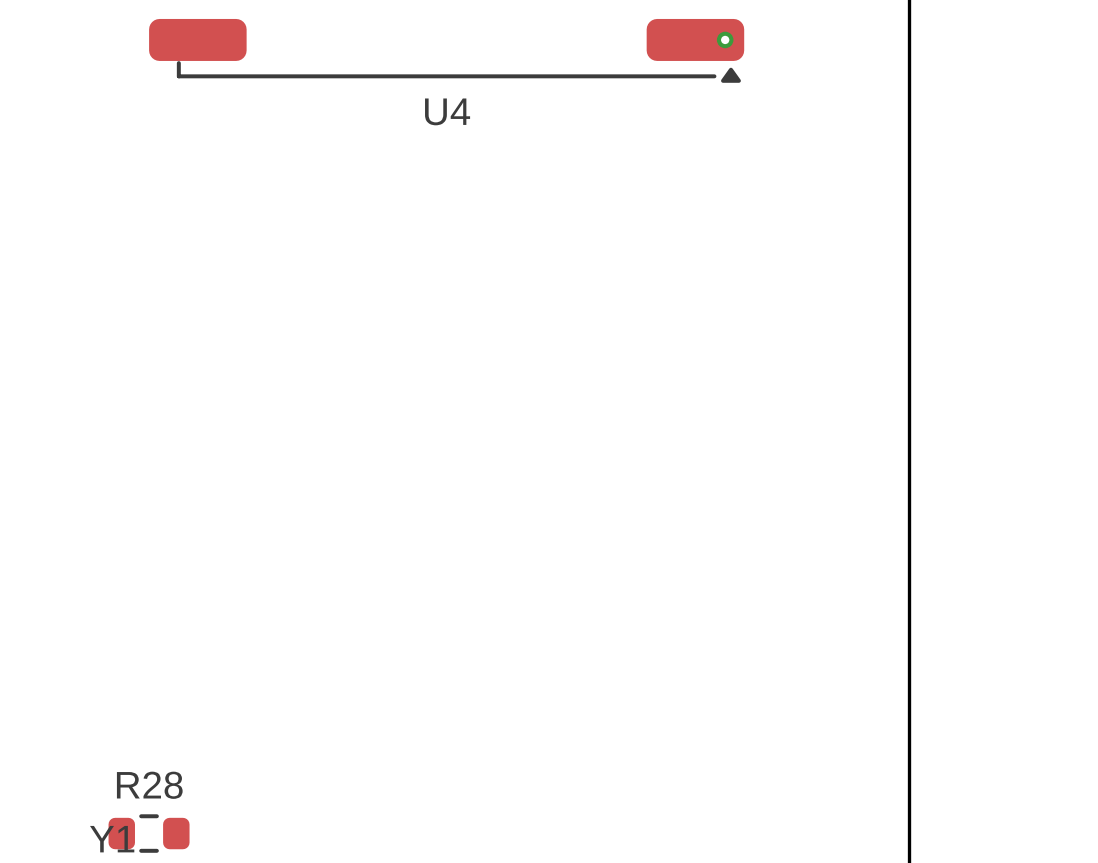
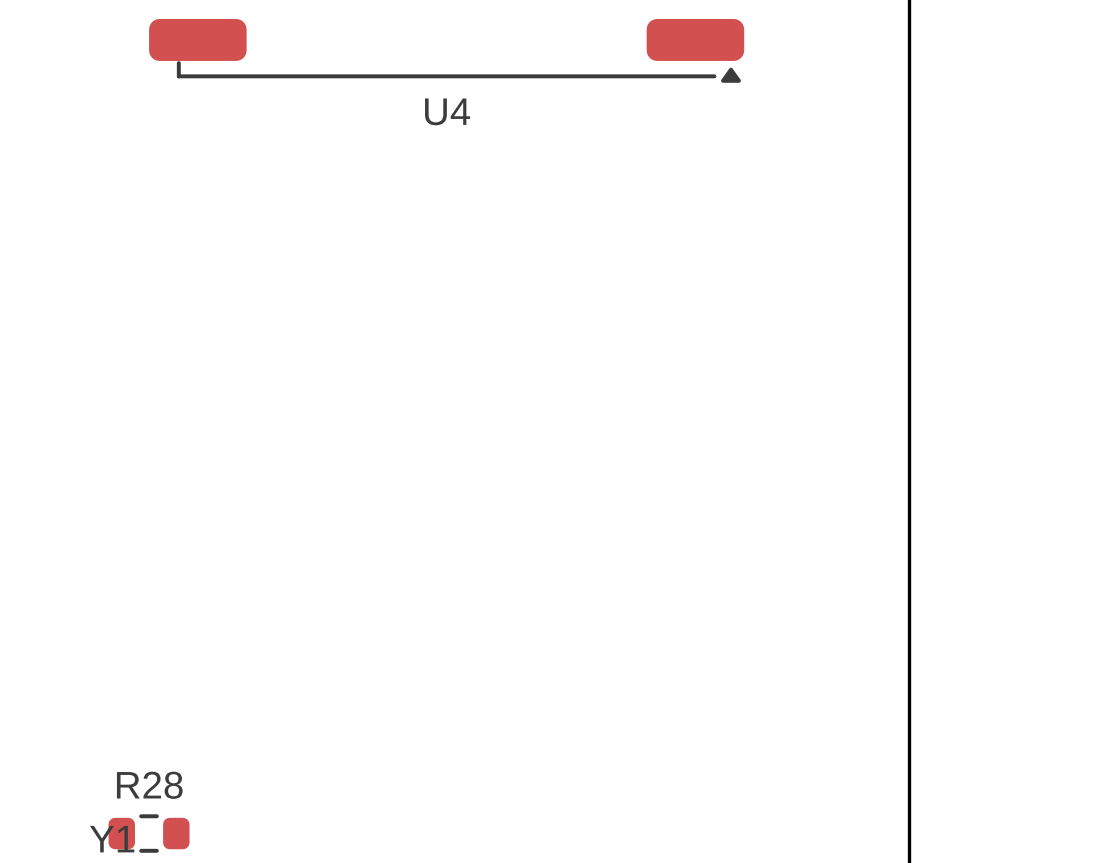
via: (725, 39) -> none

